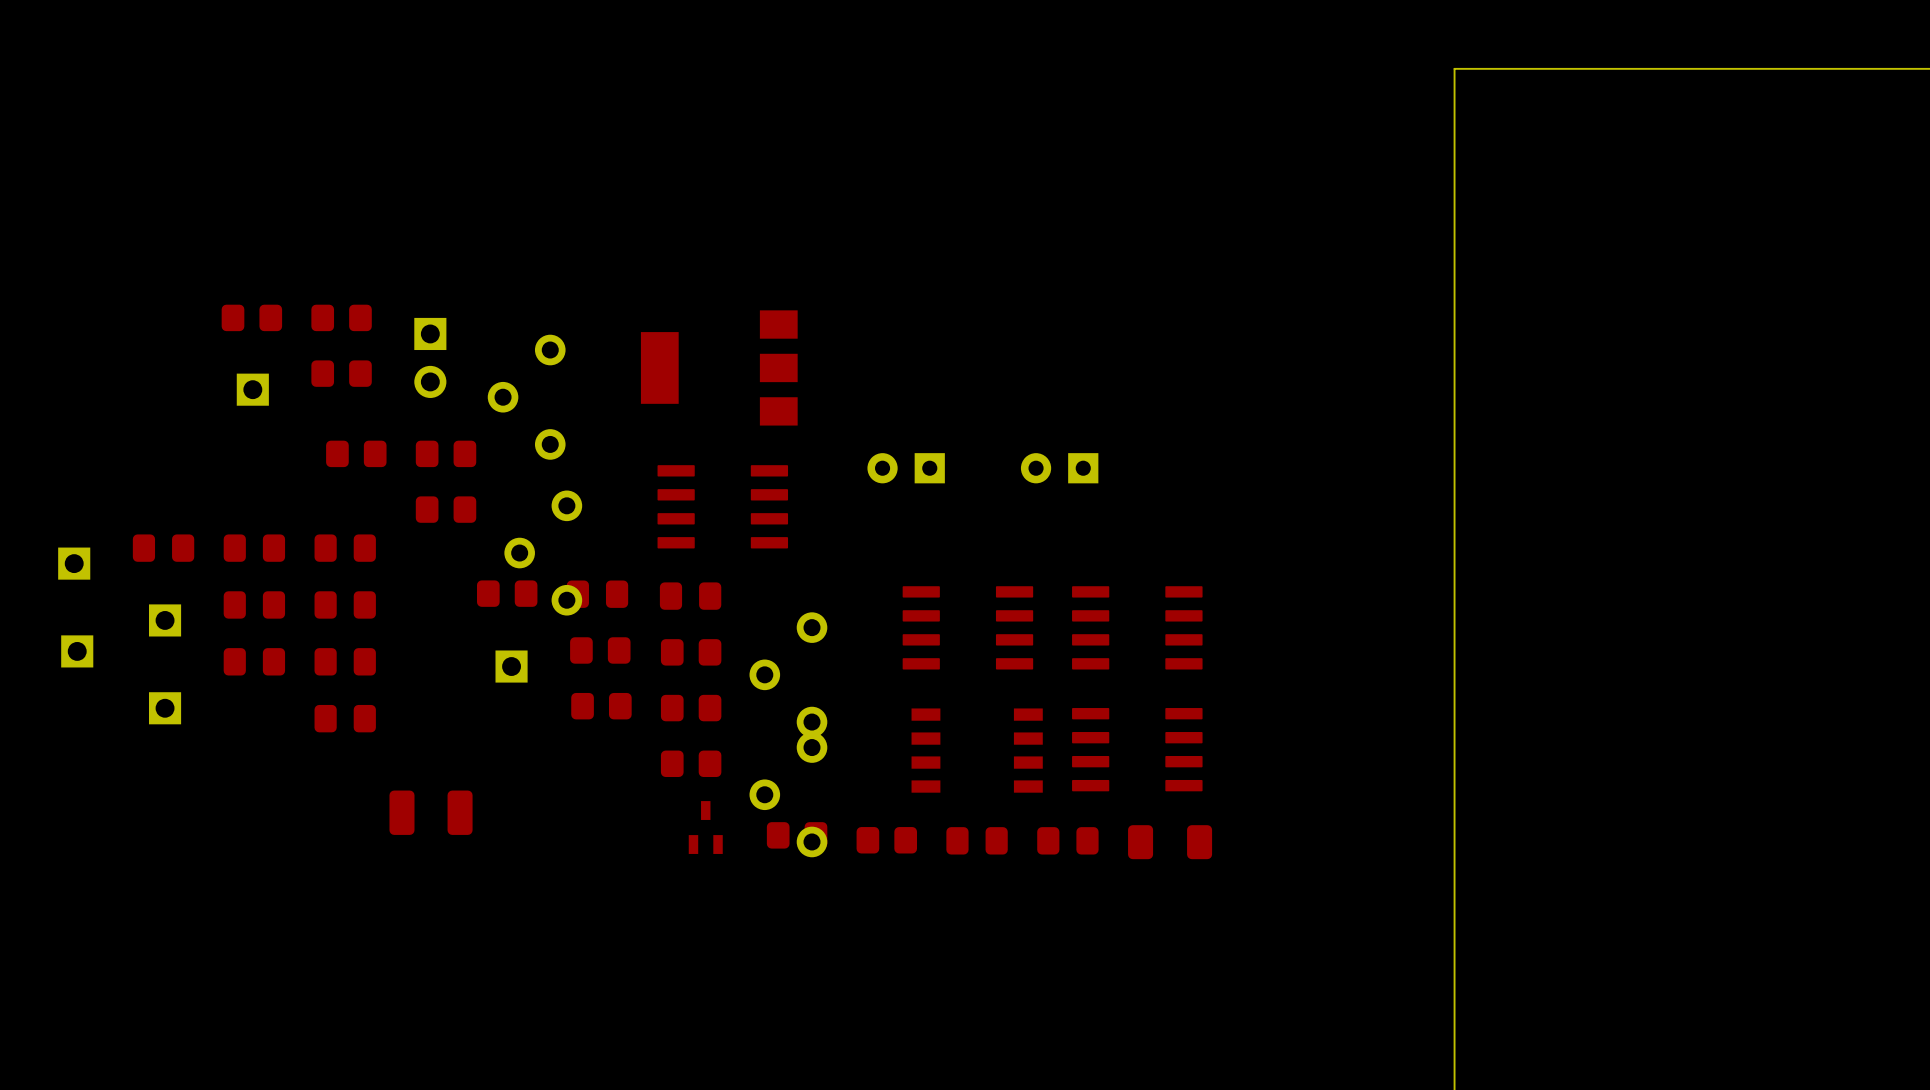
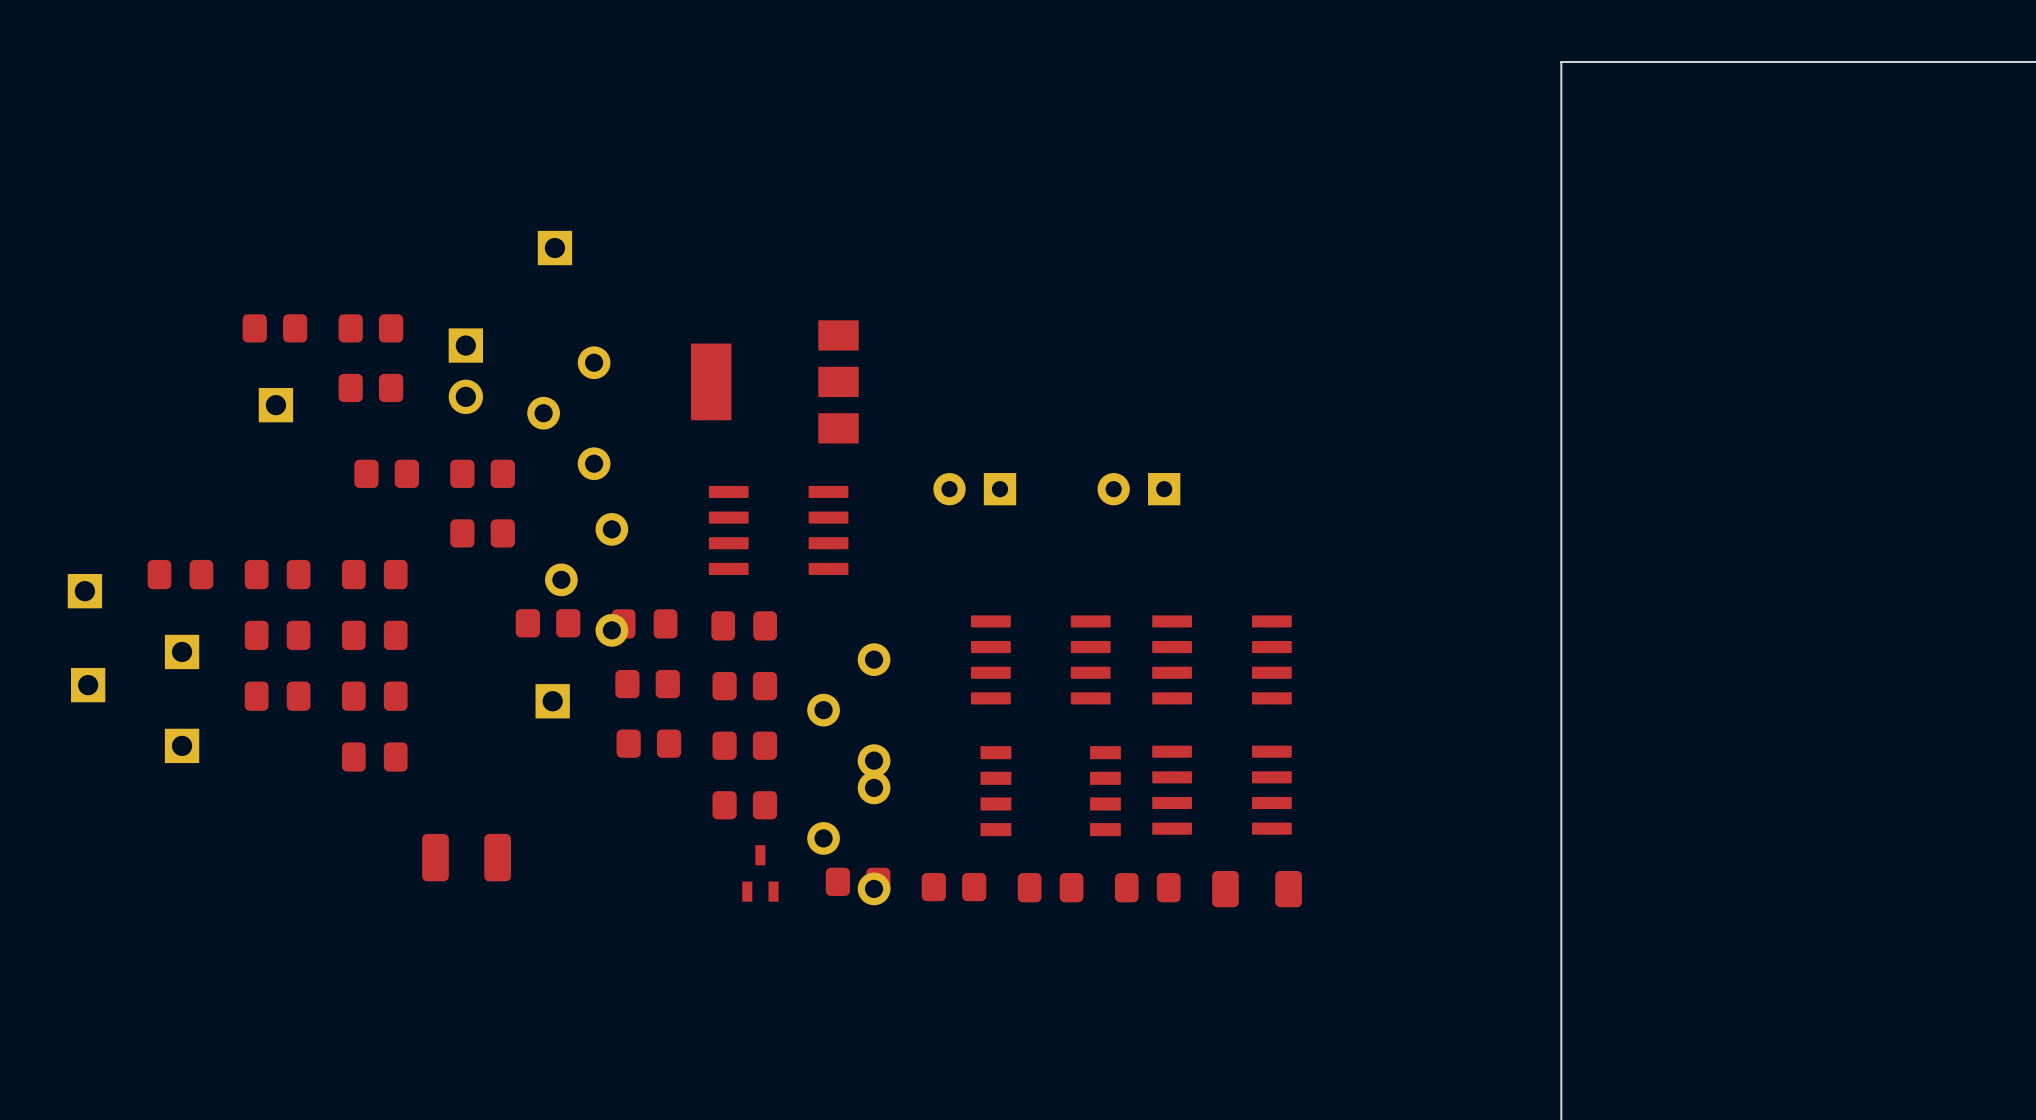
part: none -> (554, 248)

